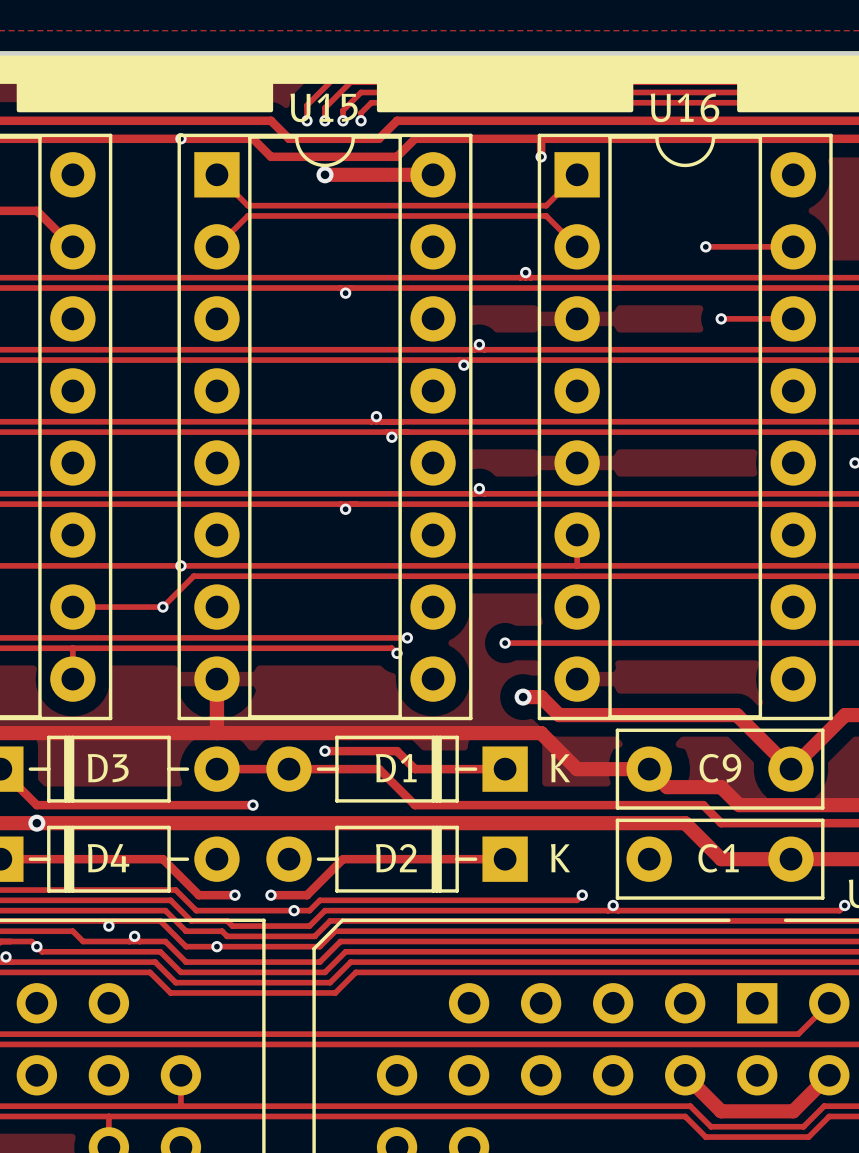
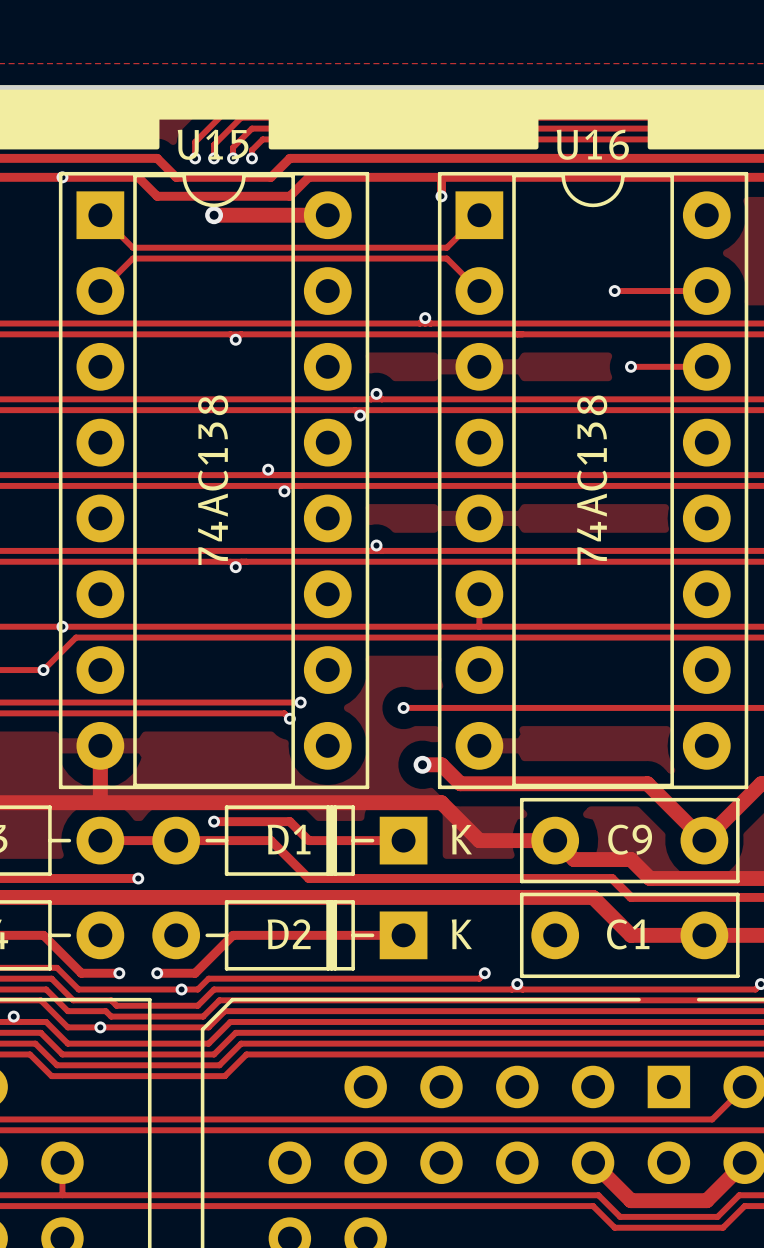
U15 value: none -> 74AC138 (213, 480)
U16 value: none -> 74AC138 (592, 480)

